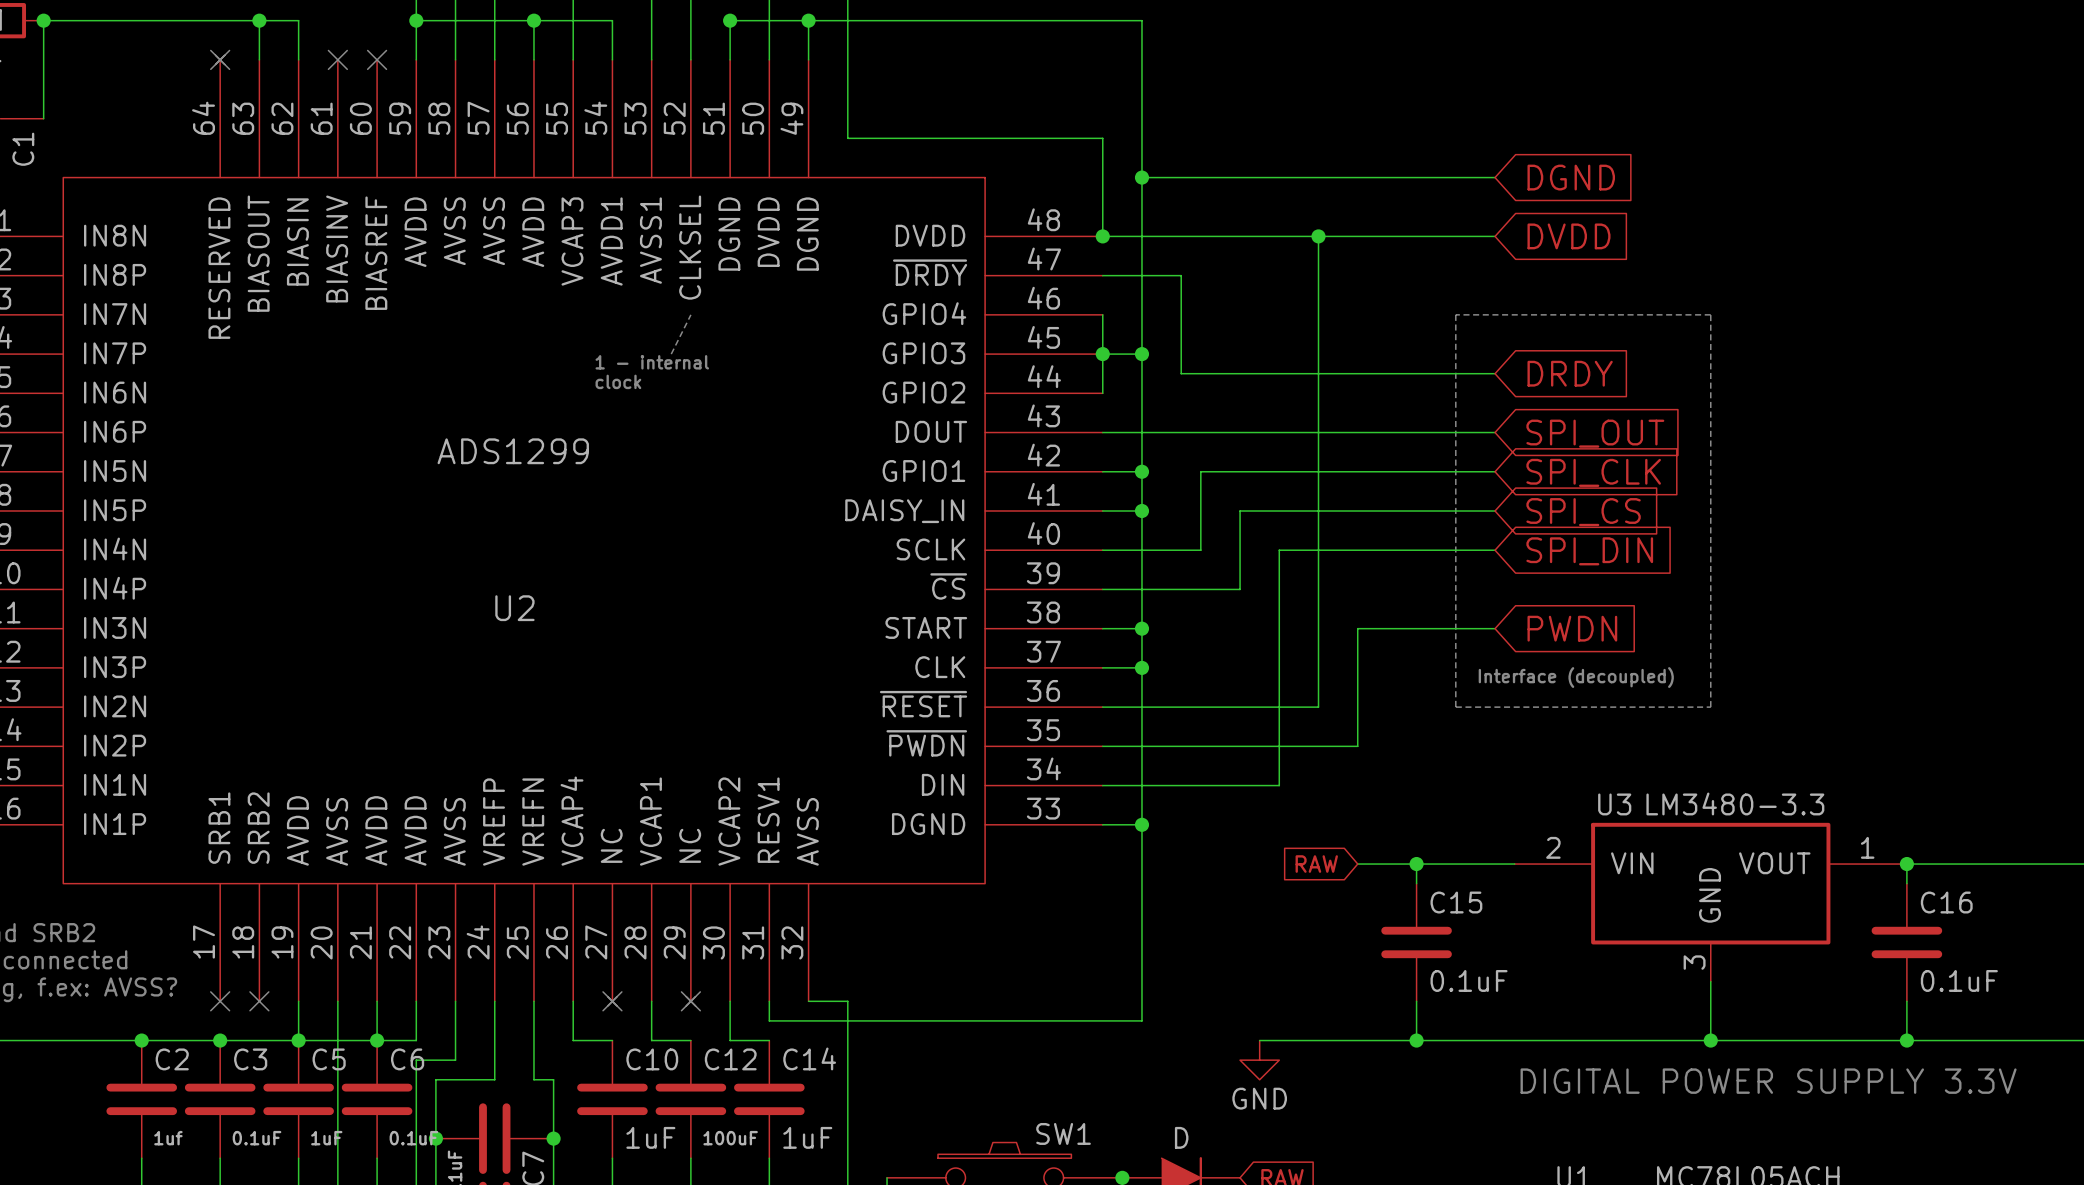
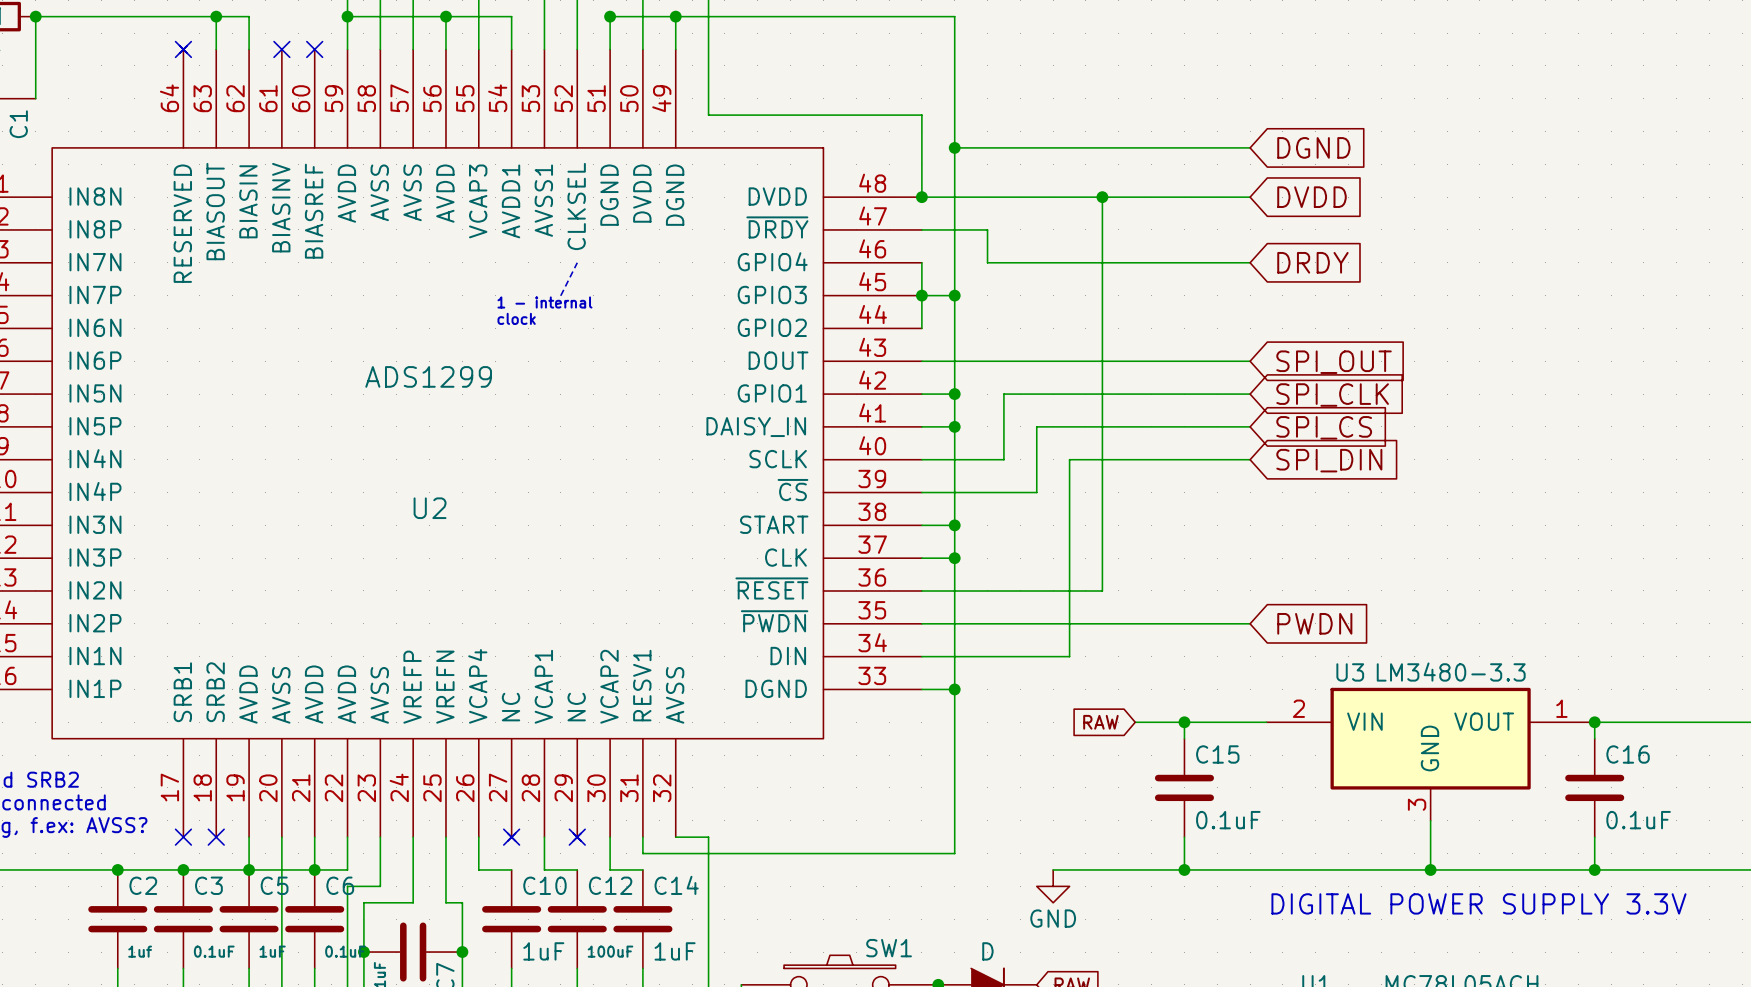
wire: (1181, 314) (1181, 373) (1495, 373) -> (987, 262) (1250, 262)
line: (1455, 314) (1455, 707) (1710, 707) (1710, 314) (1455, 314) -> none
global label position: DRDY (1570, 373) -> DRDY (1312, 262)
wire: (1495, 628) (1357, 628) (1357, 746) -> (1250, 623) (1135, 623)
global label position: PWDN (1572, 628) -> PWDN (1314, 623)
text: Interface (decoupled) (1576, 677) -> none

